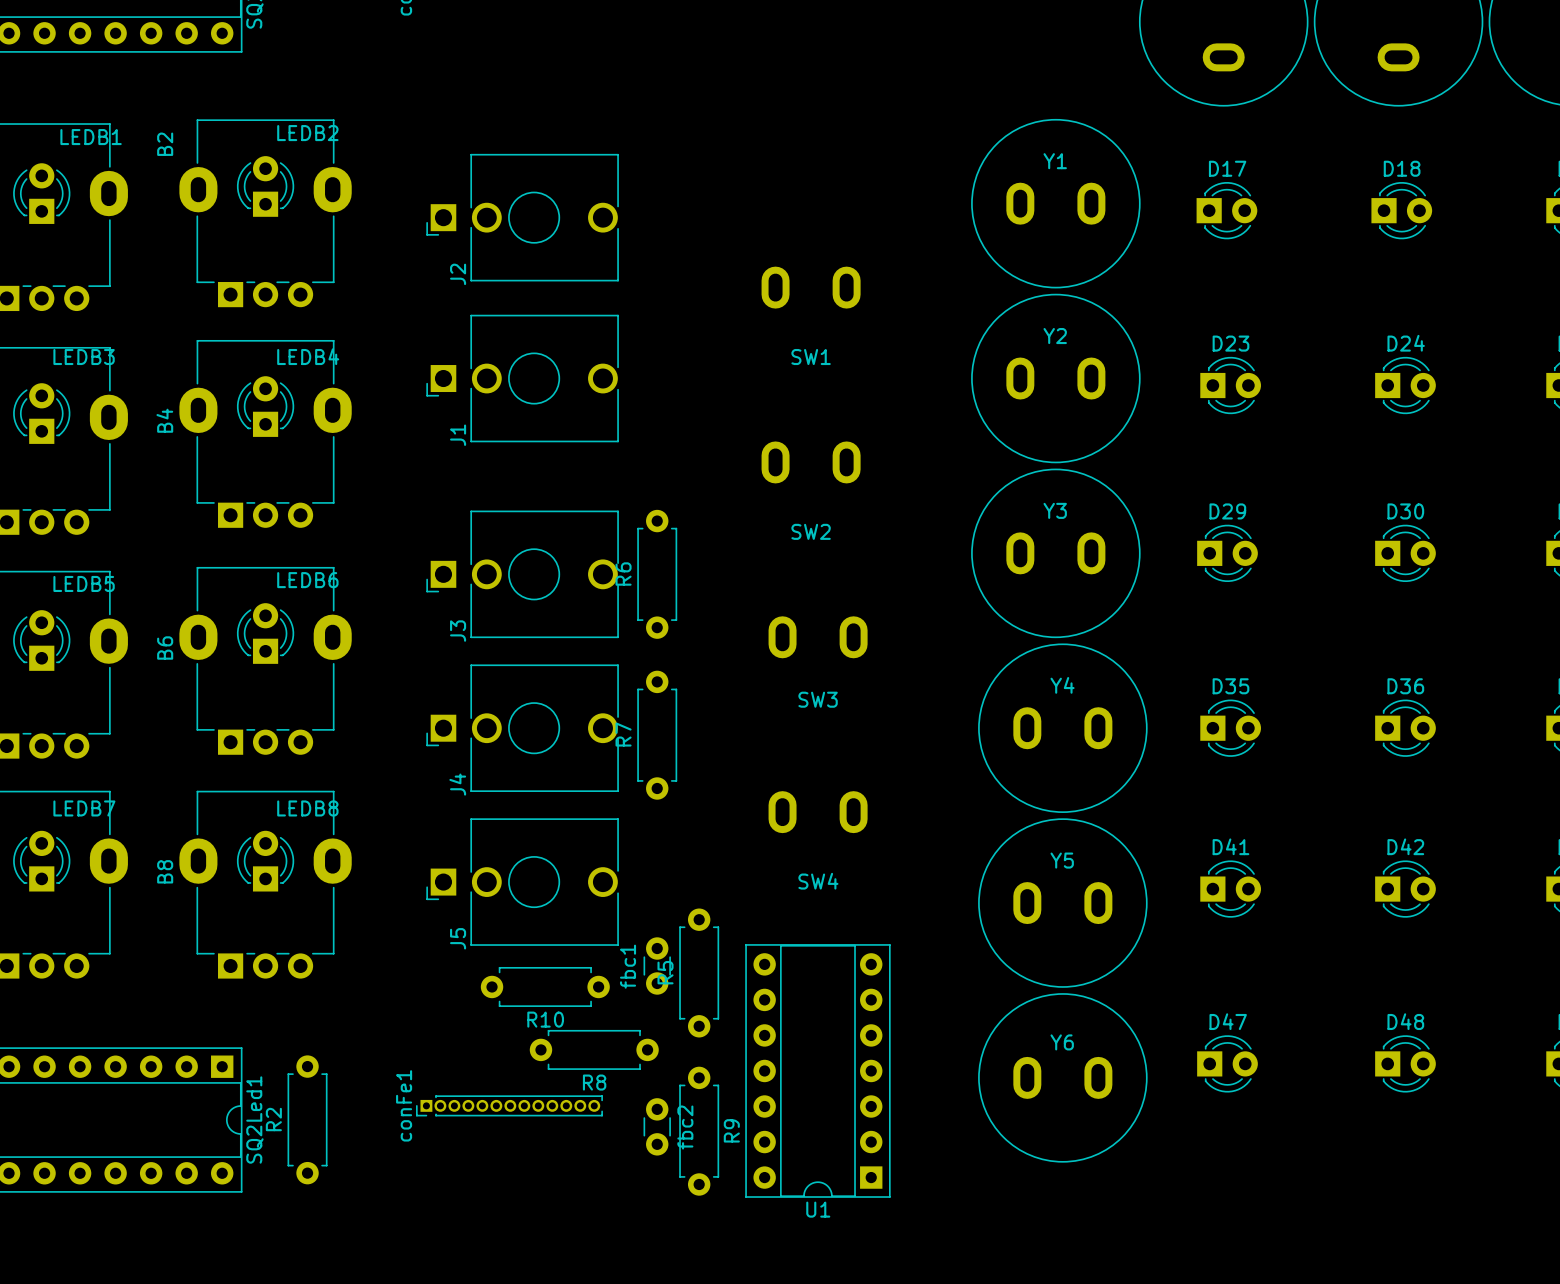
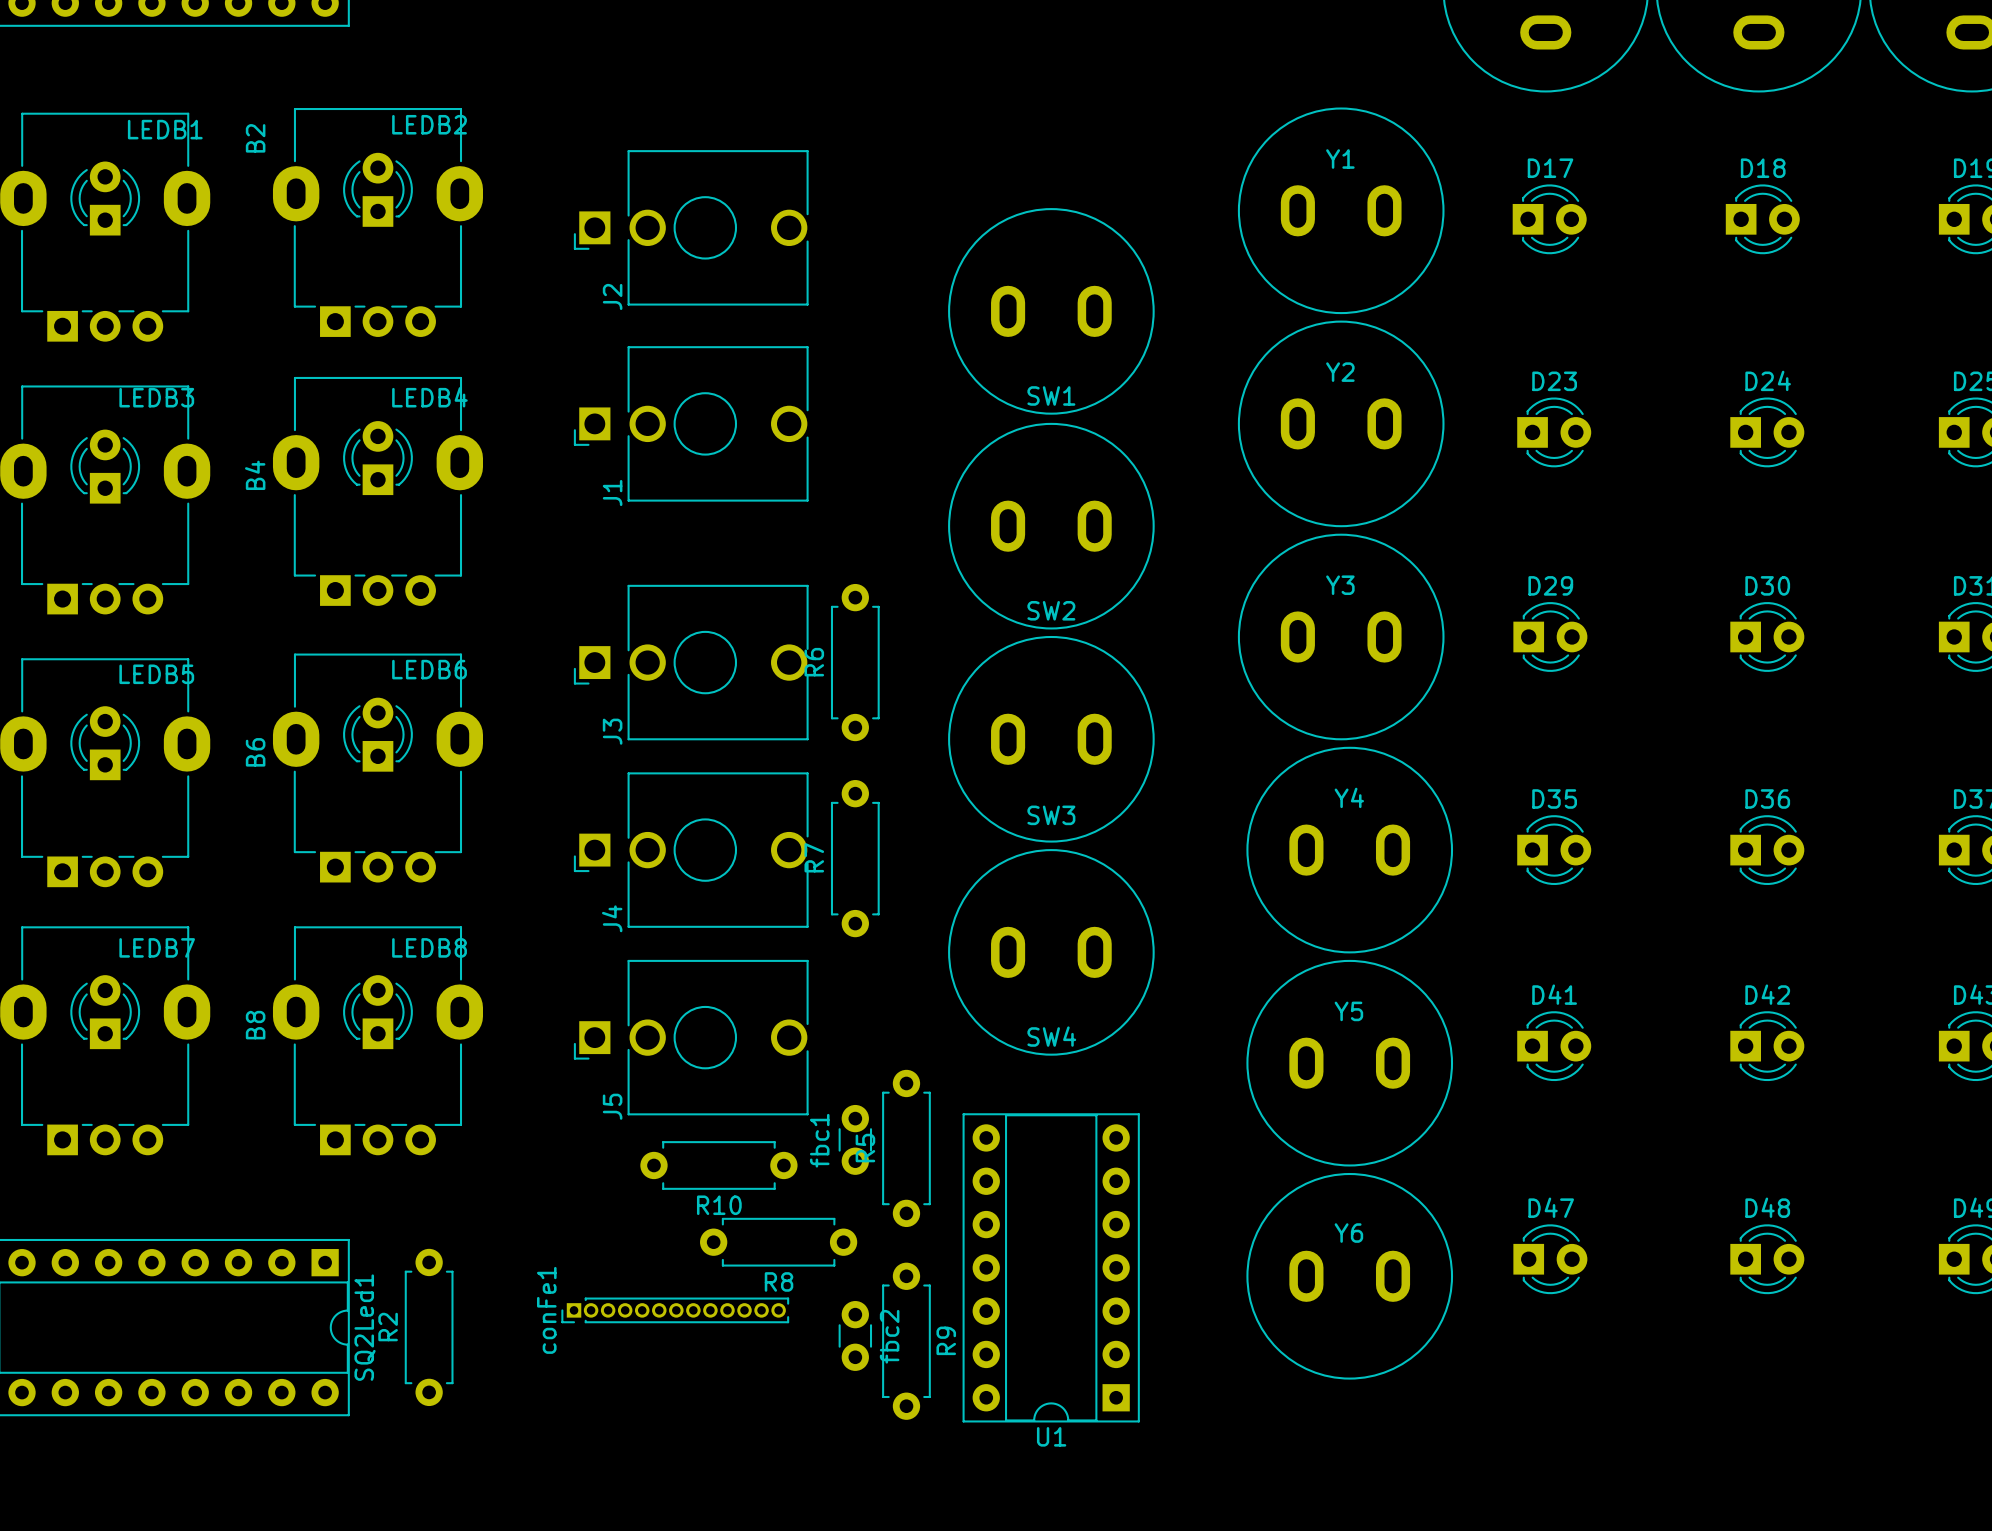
SW1 side: bottom (811, 287) -> top (1051, 311)
SW2 side: bottom (811, 462) -> top (1051, 526)
SW3 side: bottom (818, 637) -> top (1051, 739)
SW4 side: bottom (818, 812) -> top (1051, 952)

